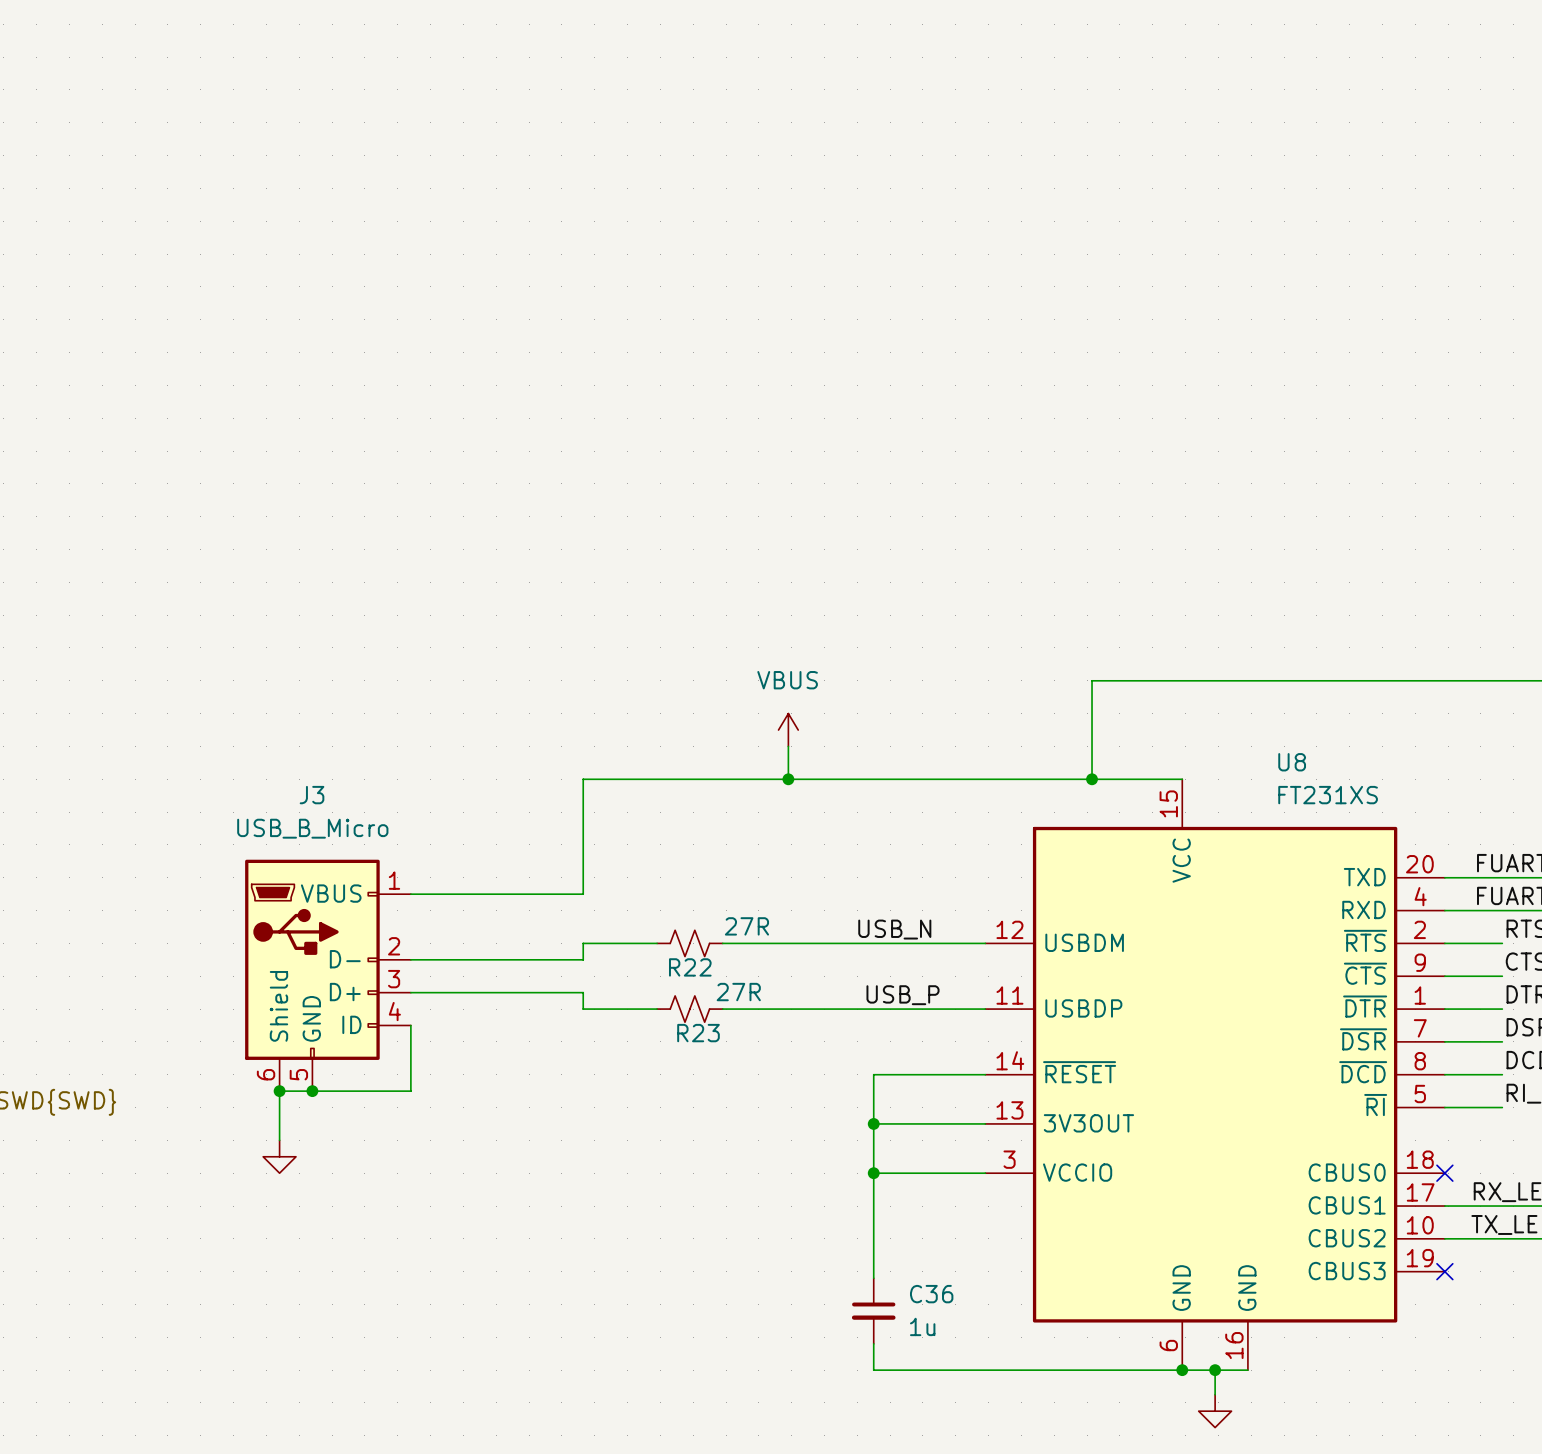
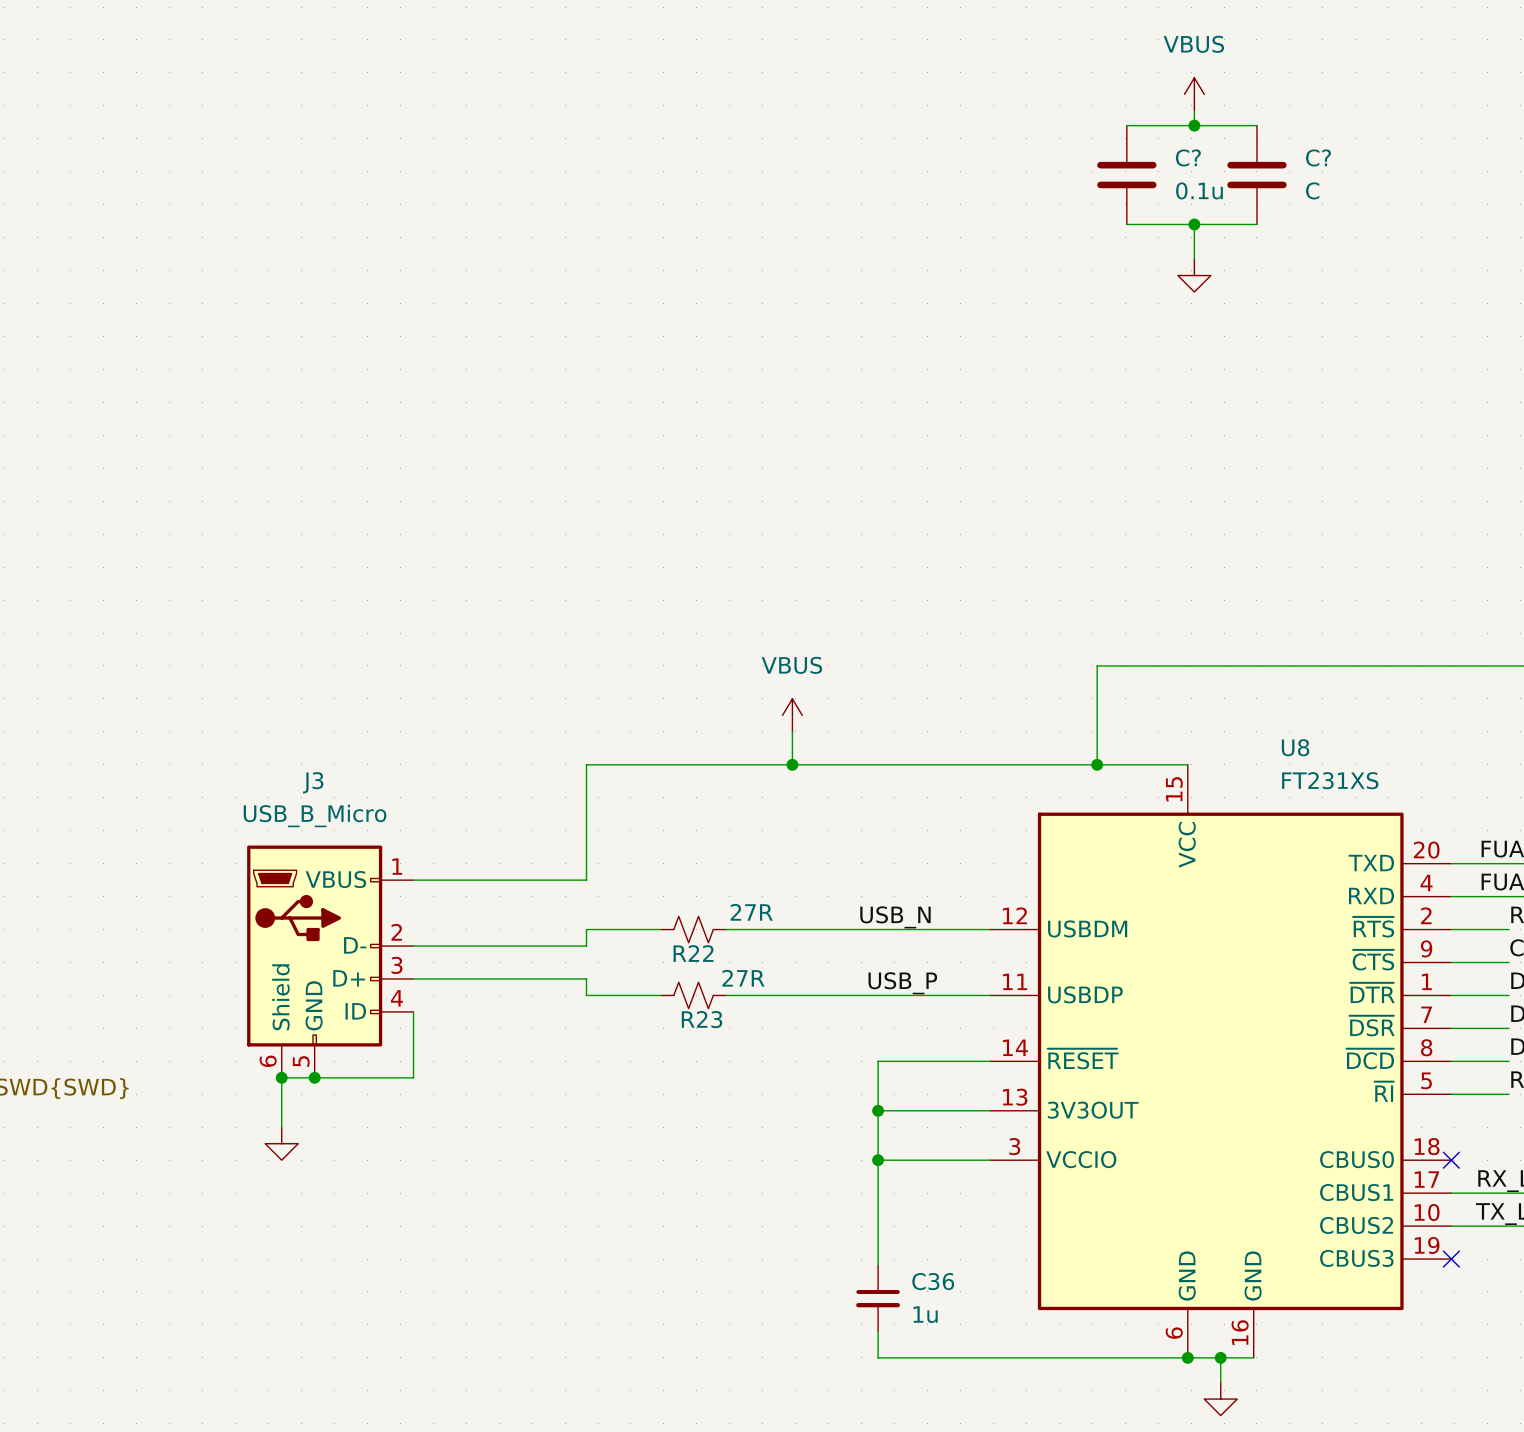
power symbol: none -> VBUS (1194, 94)
wire: none -> (1194, 110) (1194, 125)
wire: none -> (1126, 125) (1256, 125)
junction: none -> (1194, 125)
C?: none -> 0.1u (1126, 175)
C?: none -> C (1256, 175)
wire: none -> (1126, 224) (1256, 224)
wire: none -> (1194, 224) (1194, 259)
junction: none -> (1194, 224)
power symbol: none -> (1194, 275)

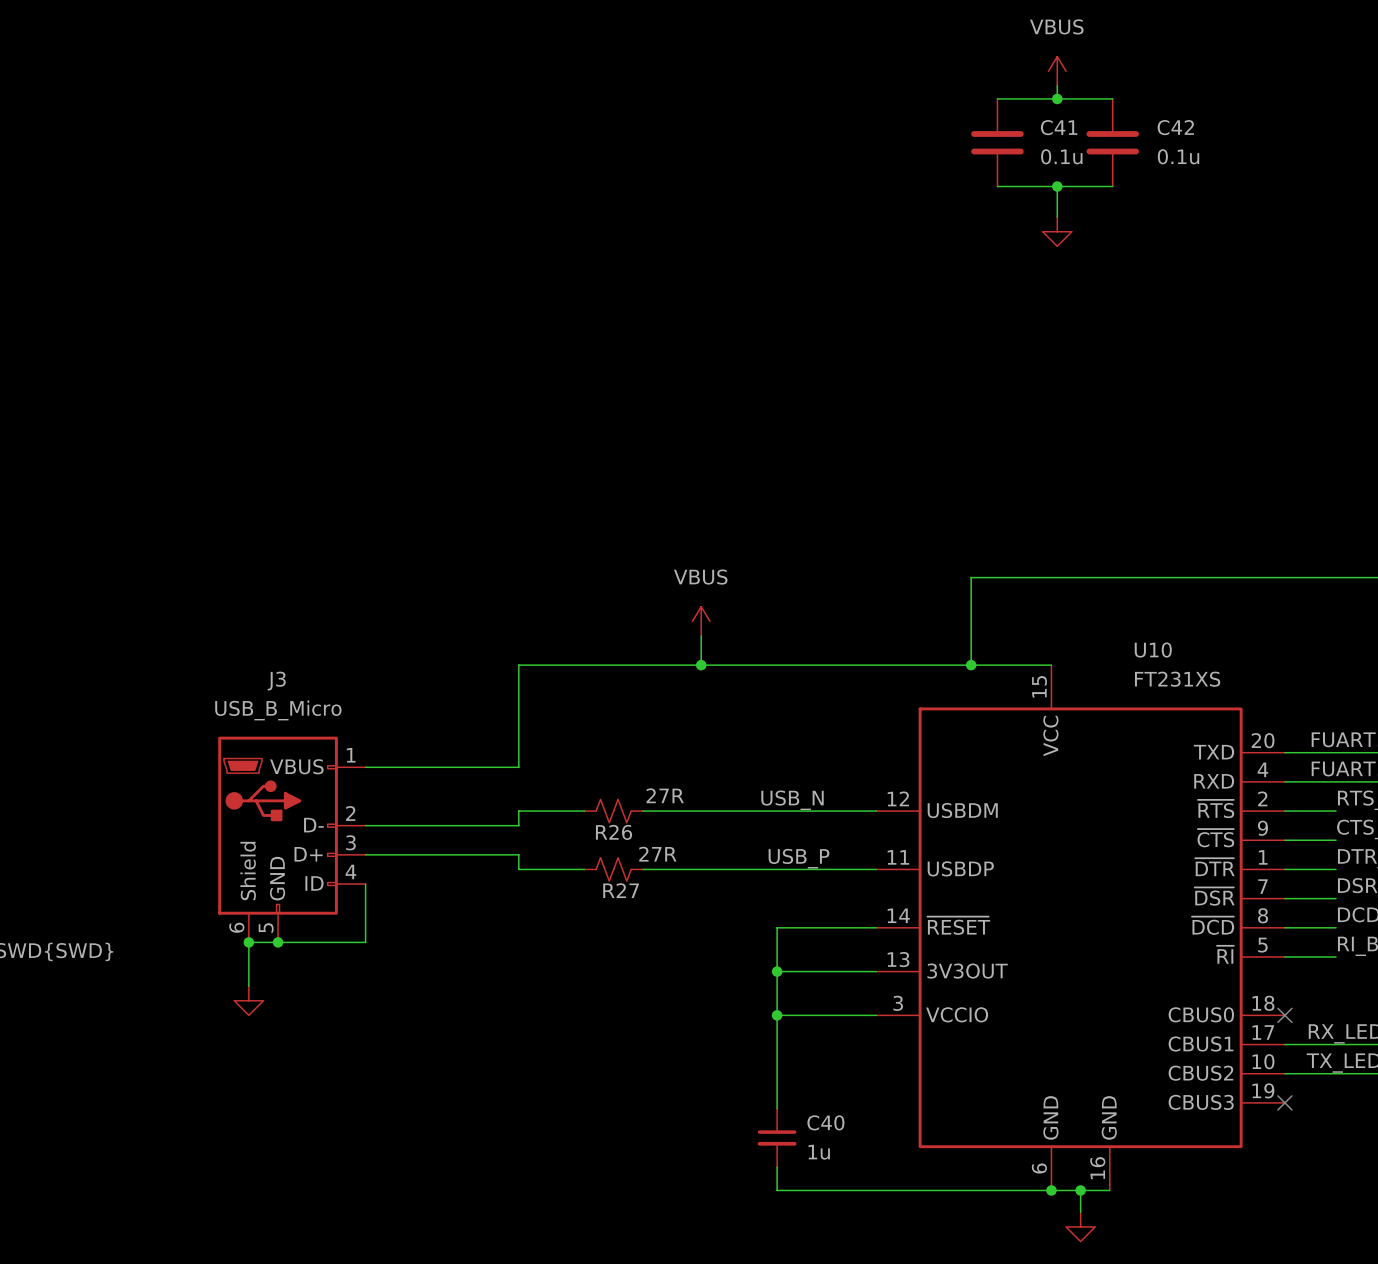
C? name: C? (1188, 157) -> C41 (1059, 127)
C? name: C? (1318, 157) -> C42 (1175, 127)
C? value: C (1312, 190) -> 0.1u (1178, 156)
U8 name: U8 (1295, 747) -> U10 (1153, 650)
R22 name: R22 (693, 953) -> R26 (614, 832)
R23 name: R23 (702, 1019) -> R27 (621, 890)
C36 name: C36 (933, 1281) -> C40 (825, 1122)

